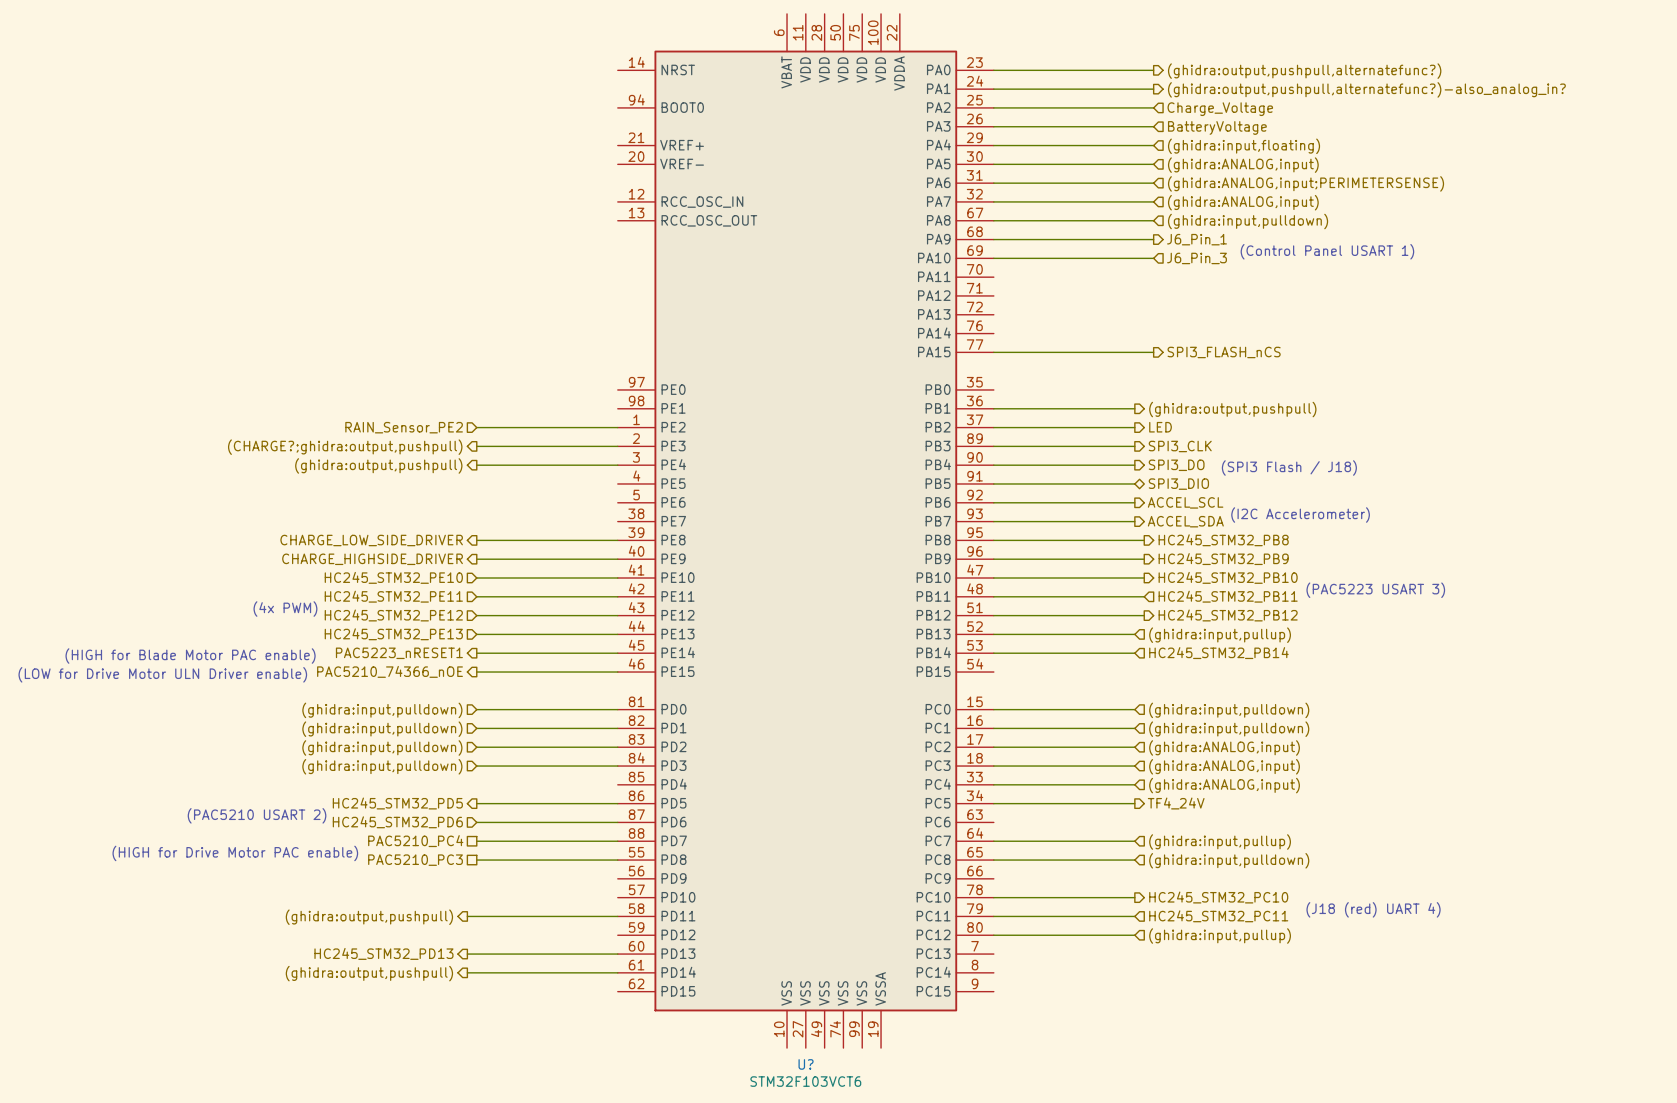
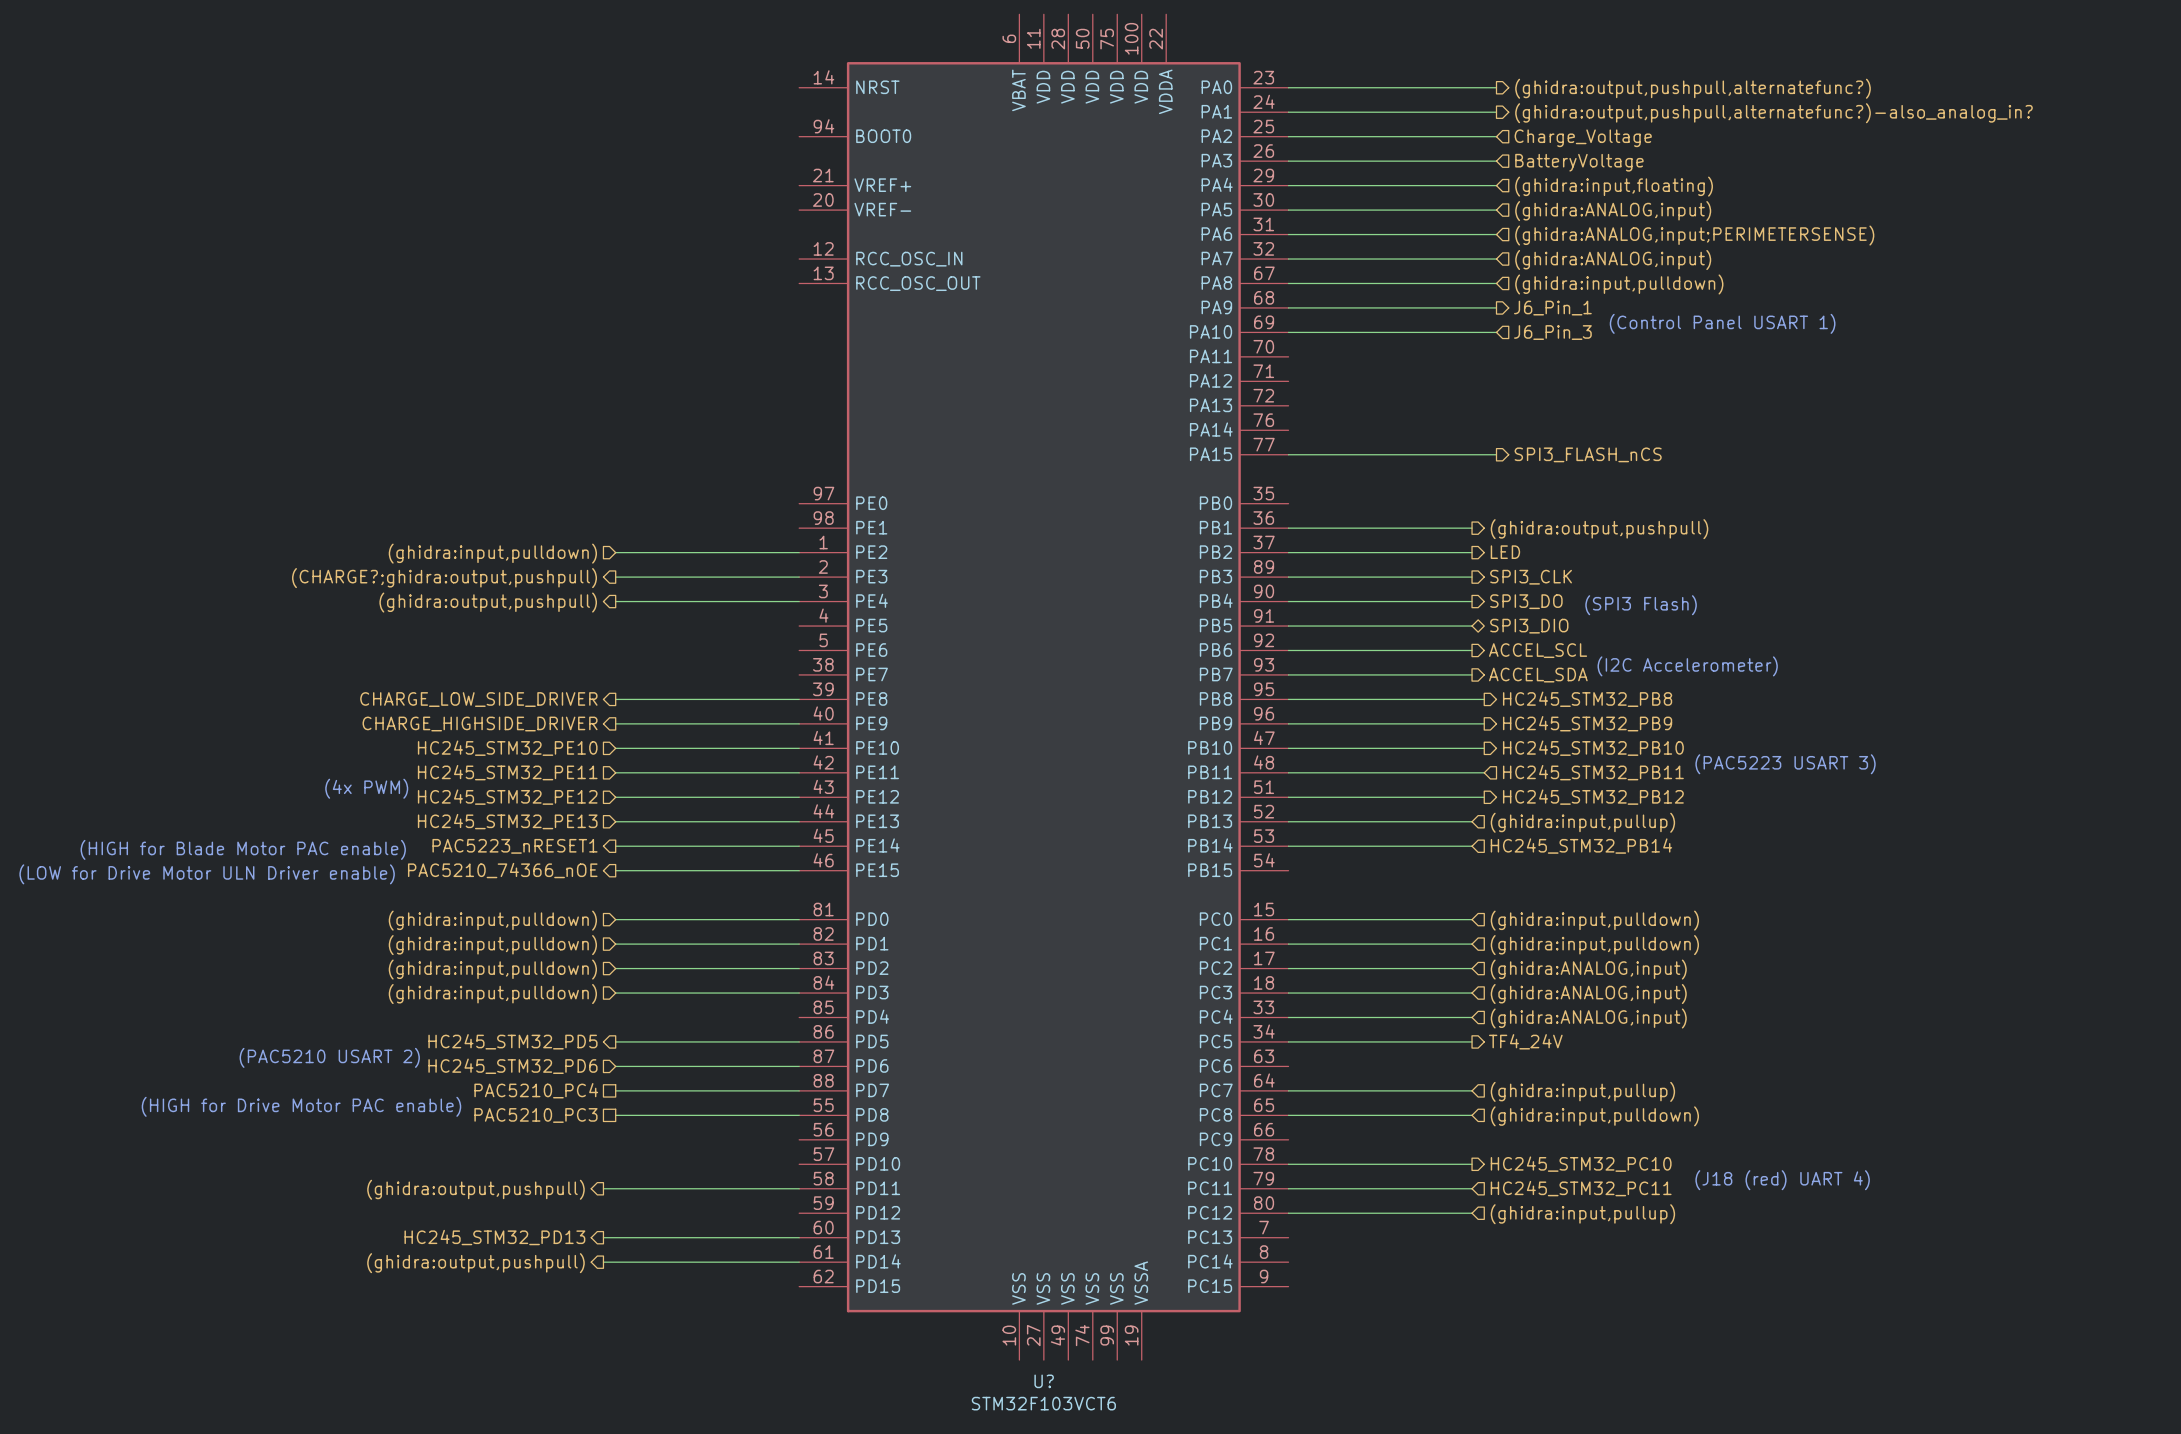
hierarchical label: RAIN_Sensor_PE2 (404, 427) -> (ghidra:input,pulldown) (492, 553)
text: (SPI3 Flash / J18) (1289, 468) -> (SPI3 Flash) (1641, 605)

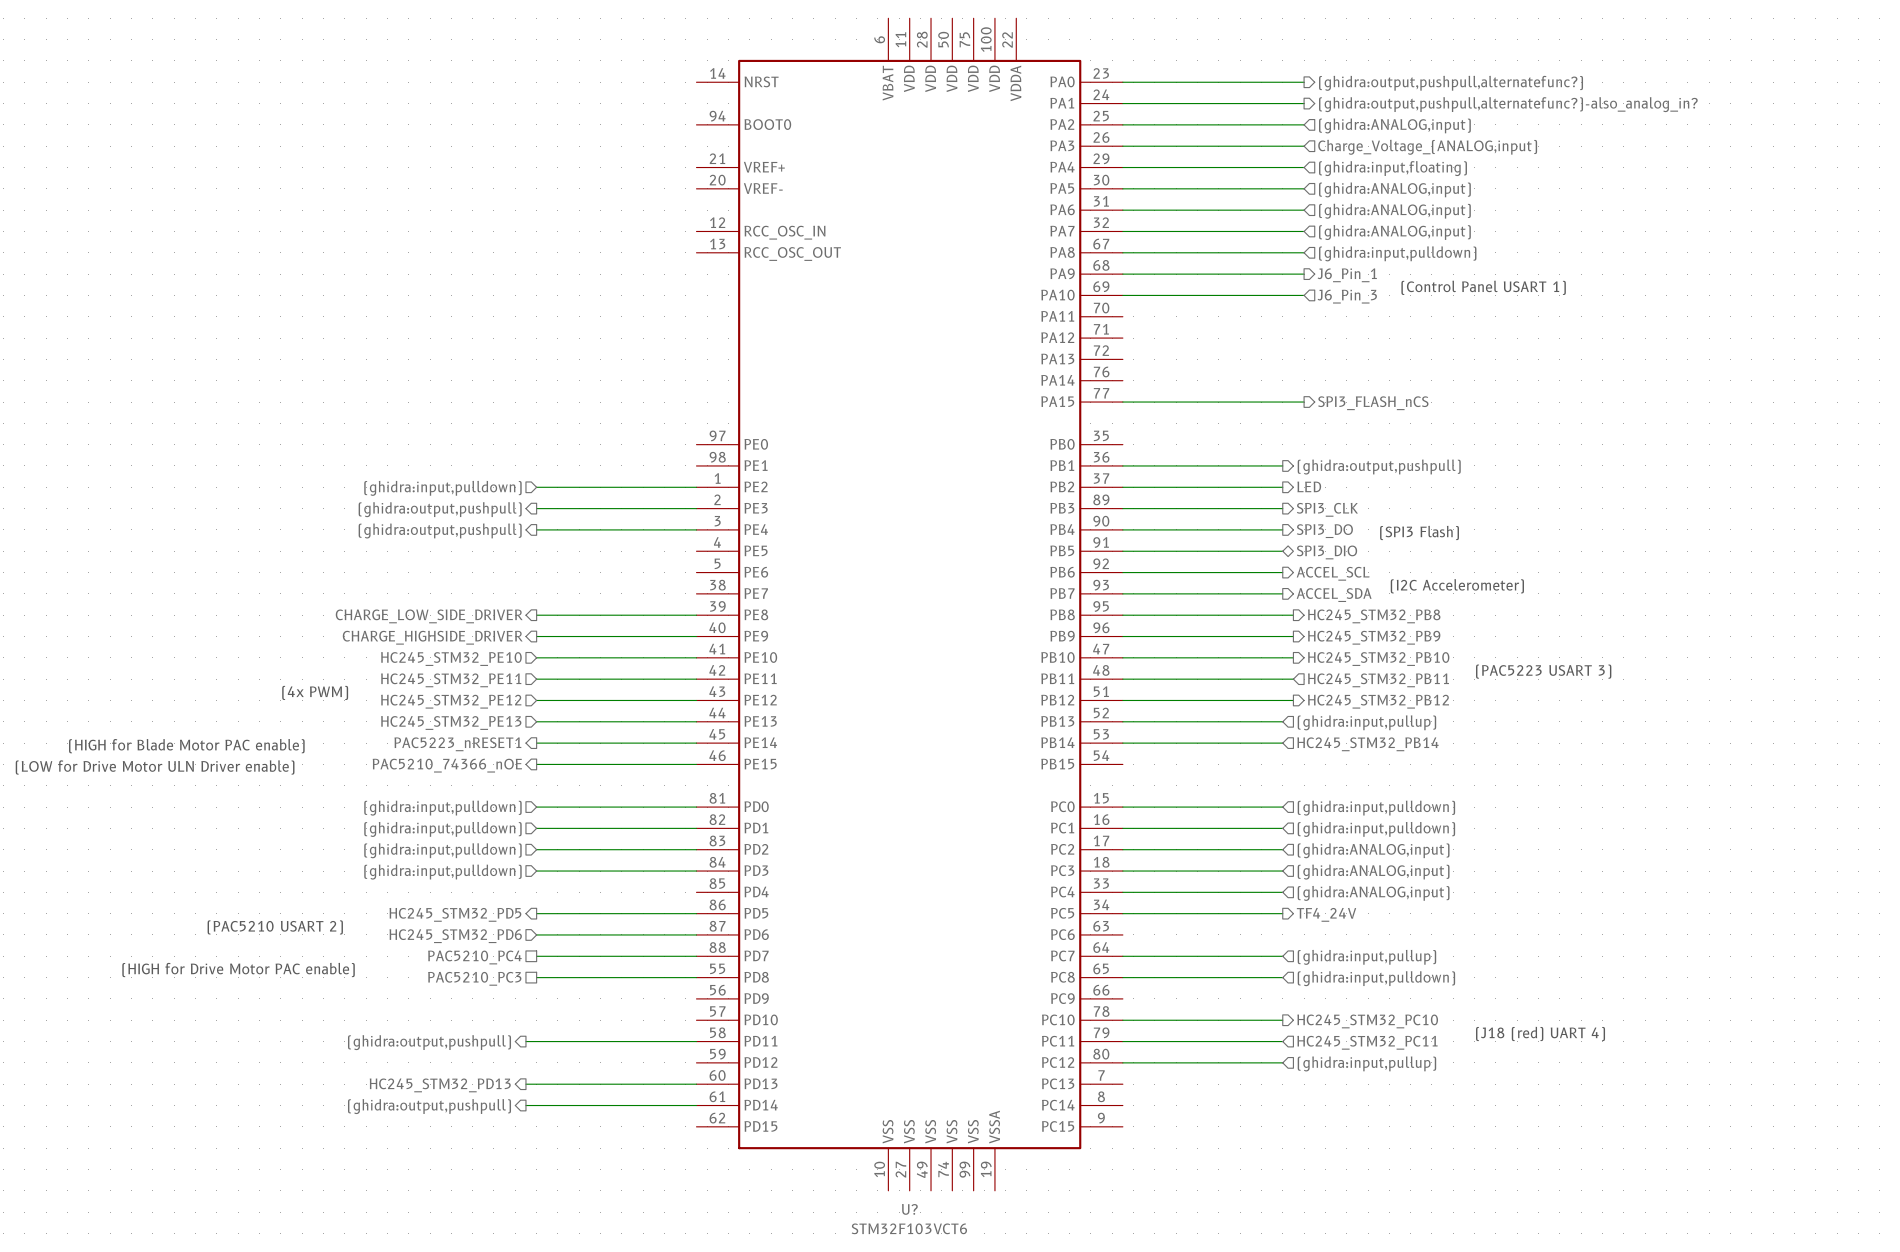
hierarchical label: Charge_Voltage (1583, 138) -> (ghidra:ANALOG,input) (1394, 125)
hierarchical label: BatteryVoltage (1579, 162) -> Charge_Voltage_(ANALOG,input) (1427, 147)
hierarchical label: (ghidra:ANALOG,input;PERIMETERSENSE) (1694, 235) -> (ghidra:ANALOG,input) (1394, 211)
hierarchical label: (CHARGE?;ghidra:output,pushpull) (444, 578) -> (ghidra:output,pushpull) (440, 509)

